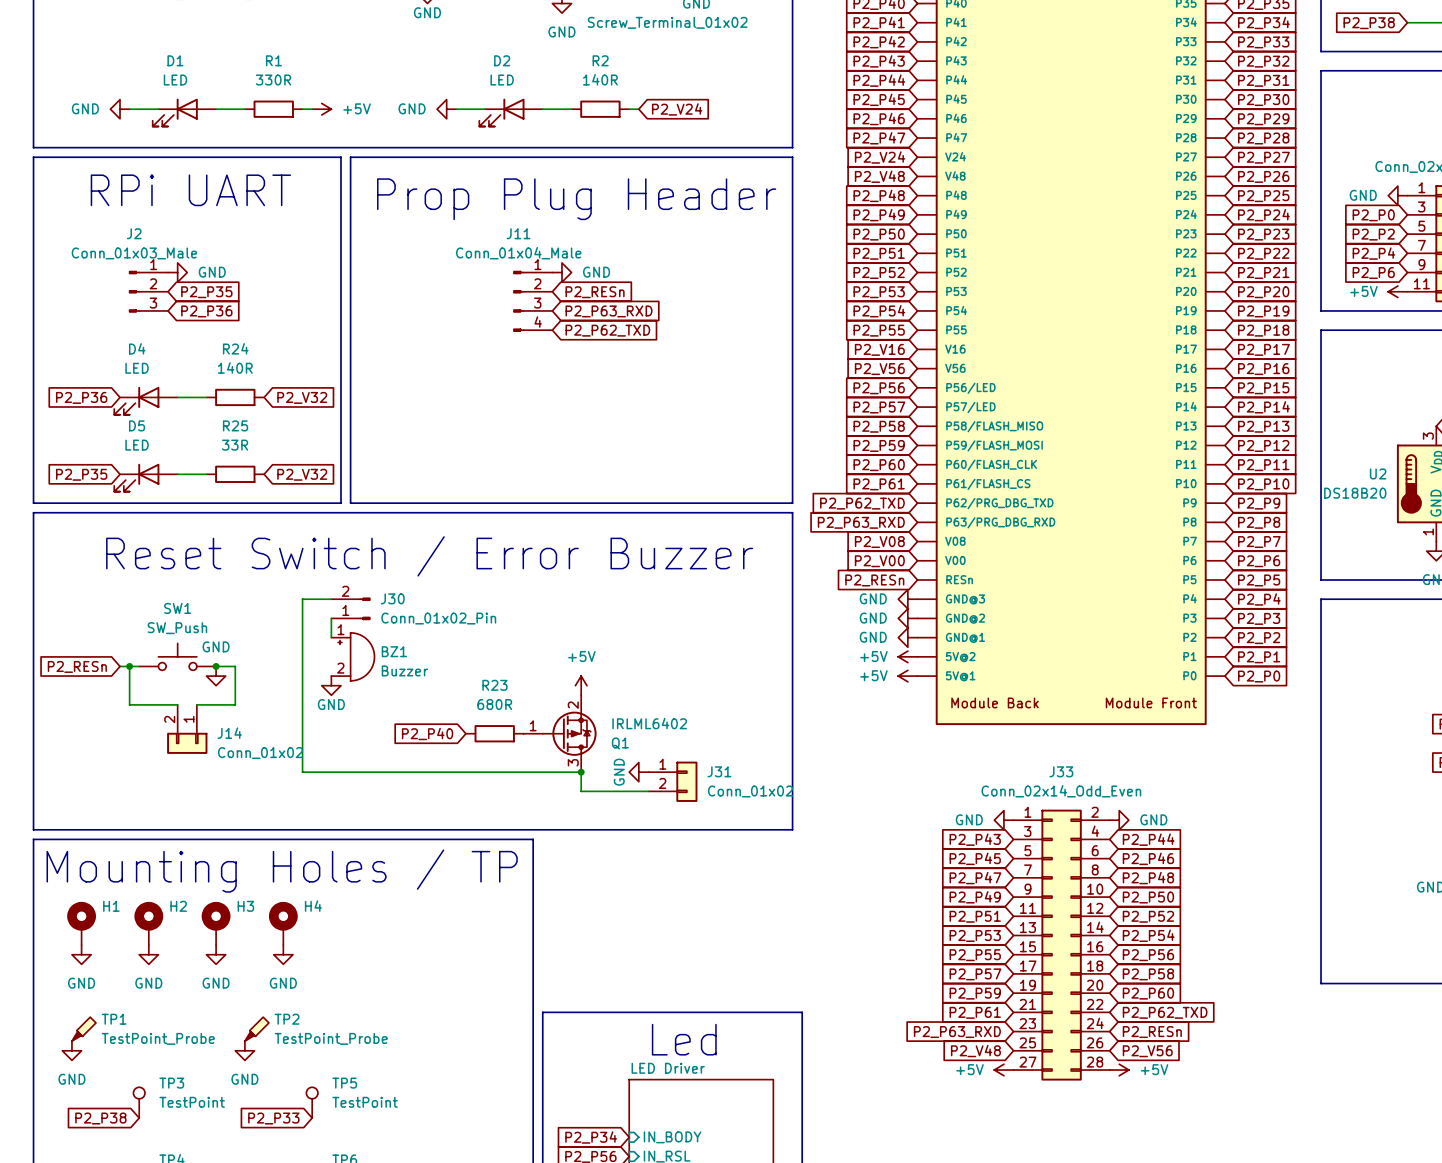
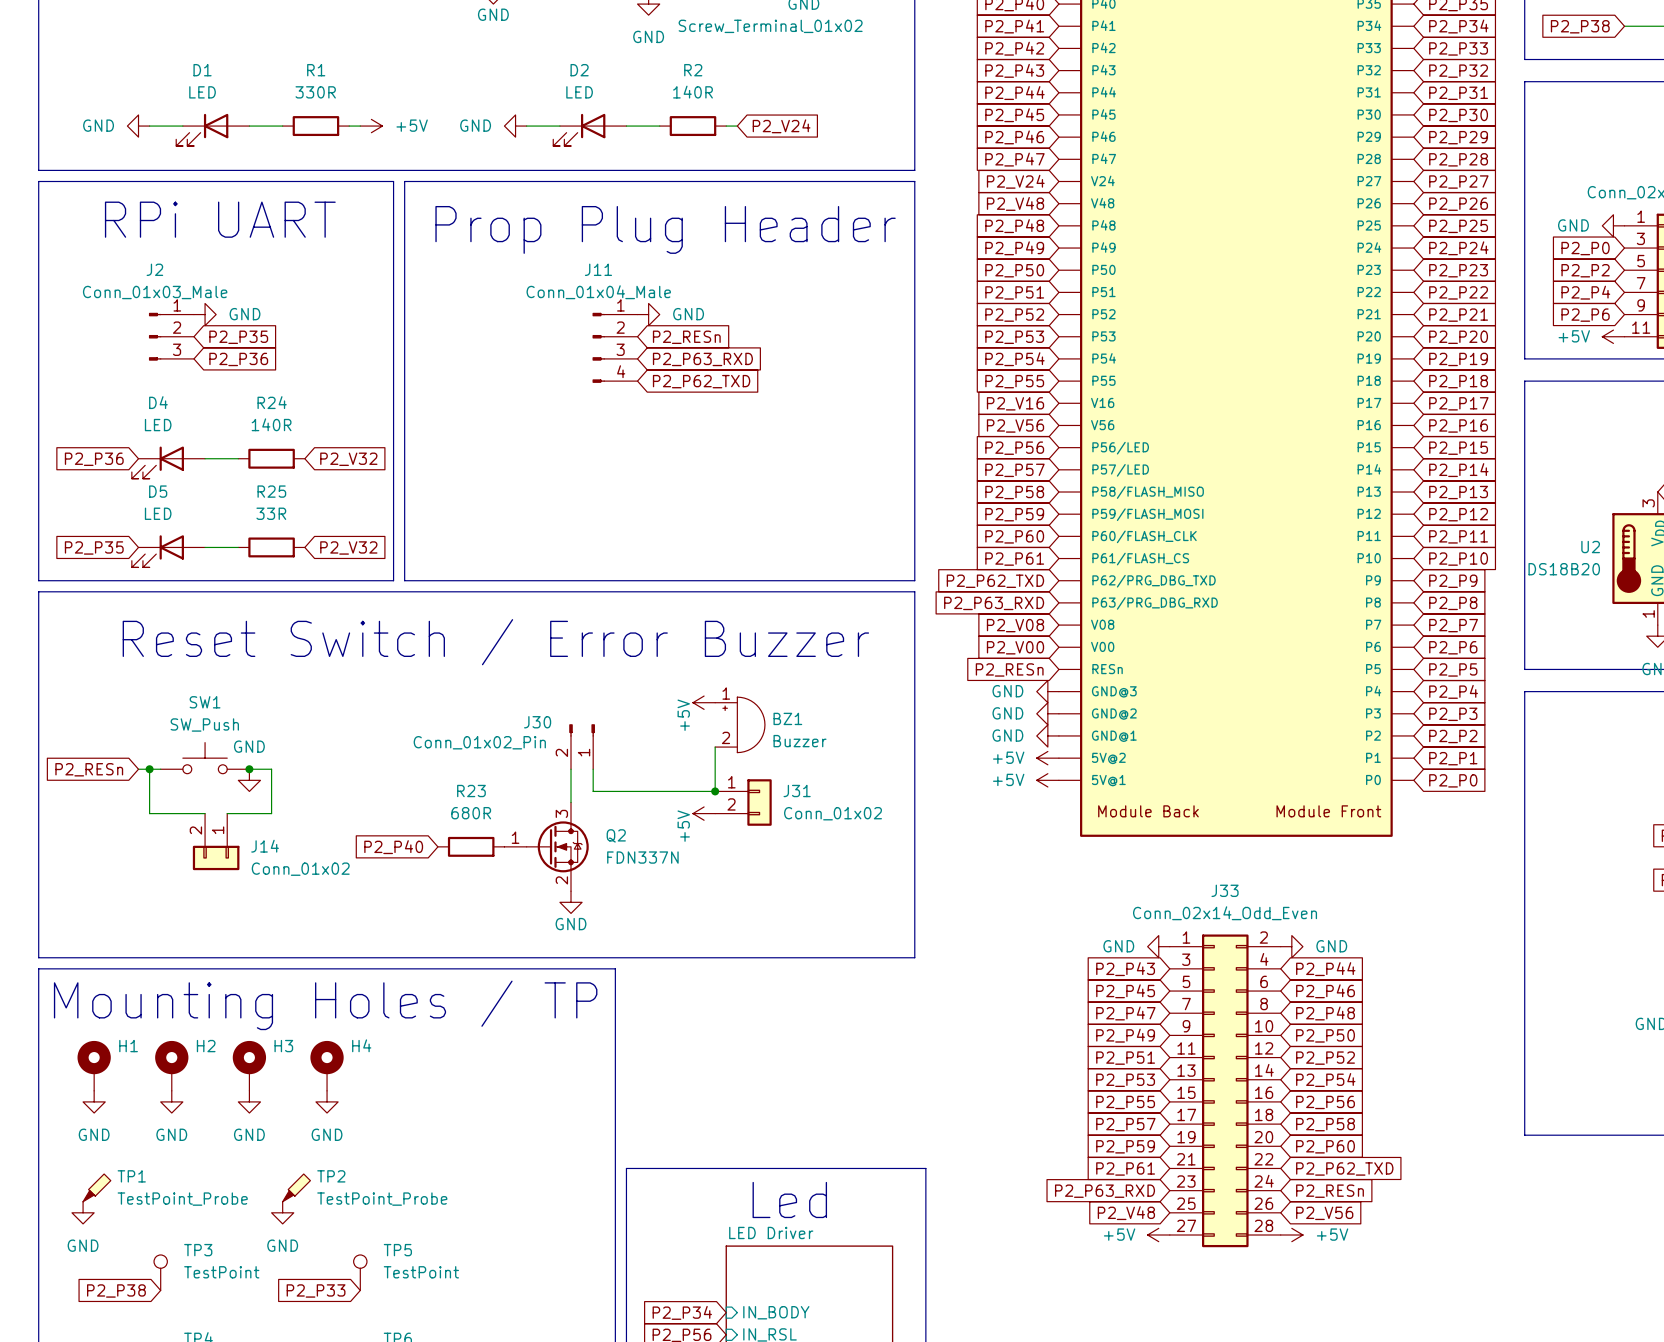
J30 name position: J30 (392, 598) -> J30 (537, 722)
wire: (331, 599) (302, 599) (302, 772) (581, 772) (581, 791) (648, 791) -> none
J30 position: (350, 608) -> (582, 746)
J30 rotation: 0° (365, 608) -> 90° counterclockwise (582, 730)
power symbol: none -> +5V (704, 702)
wire: (331, 618) (331, 637) -> none
J30 value position: Conn_01x02_Pin (438, 618) -> Conn_01x02_Pin (479, 742)
wire: none -> (715, 747) (715, 791) (593, 791) (593, 769)
BZ1 position: (352, 656) -> (740, 724)
power symbol text position: +5V (581, 656) -> +5V (683, 826)
wire: none -> (571, 769) (571, 802)
power symbol: GND (331, 685) -> none
power symbol rotation: 0° (581, 685) -> 90° counterclockwise (704, 813)
power symbol position: +5V (581, 685) -> +5V (704, 813)
junction: none -> (715, 791)
global label position: P2_P40 (427, 733) -> P2_P40 (393, 847)
Q2: none -> FDN337N (546, 846)
R23 position: (494, 733) -> (471, 846)
Q1: IRLML6402 (560, 733) -> none
junction: (581, 772) -> none
power symbol: GND (638, 772) -> none
power symbol: none -> GND (571, 902)
J31 position: (672, 781) -> (743, 802)

